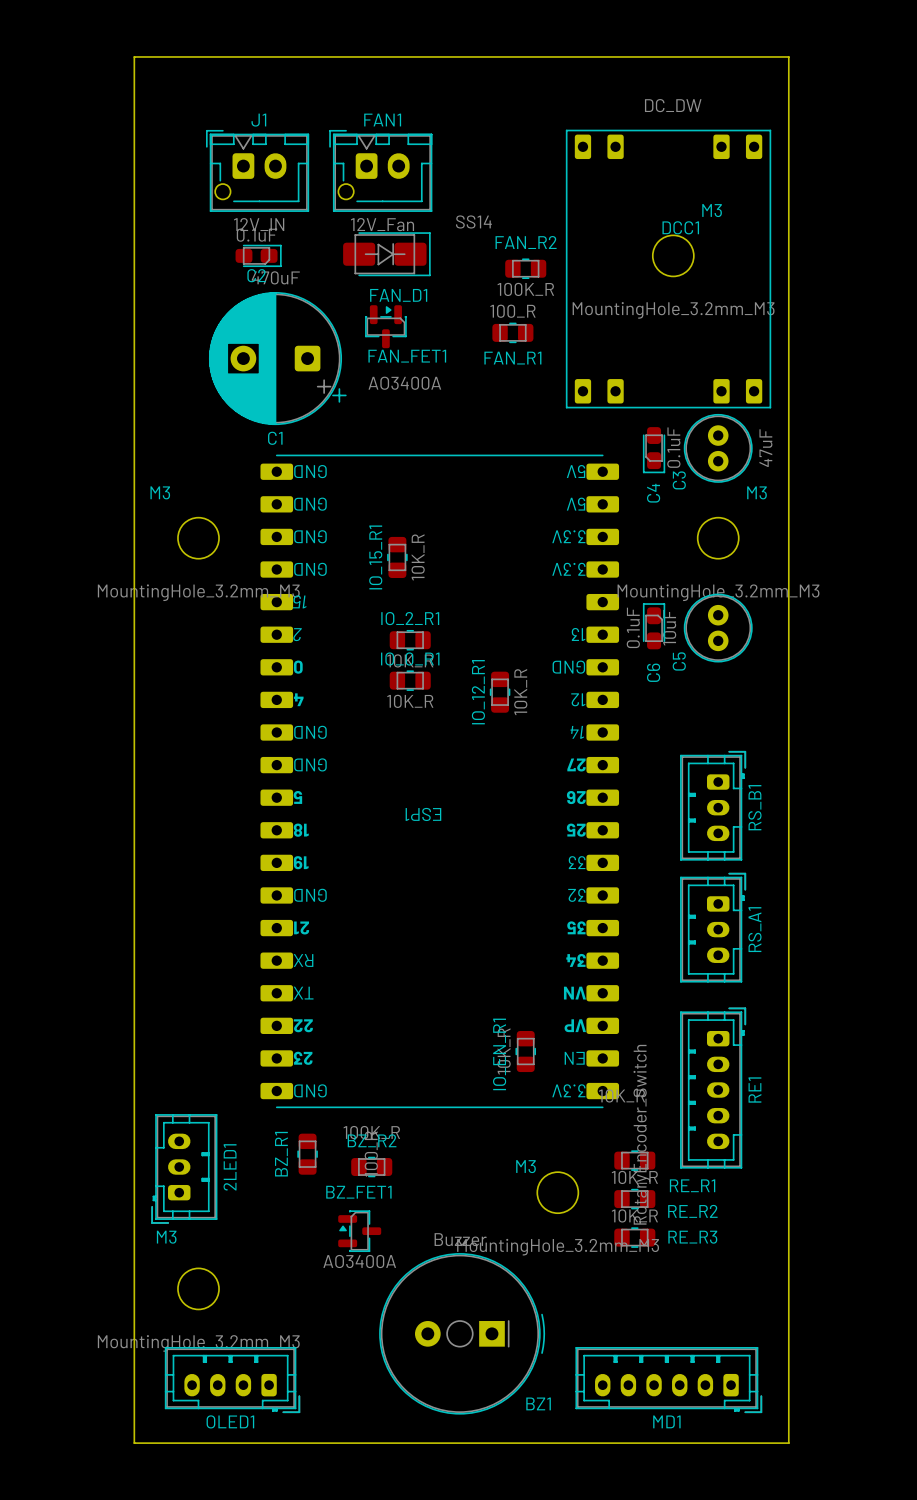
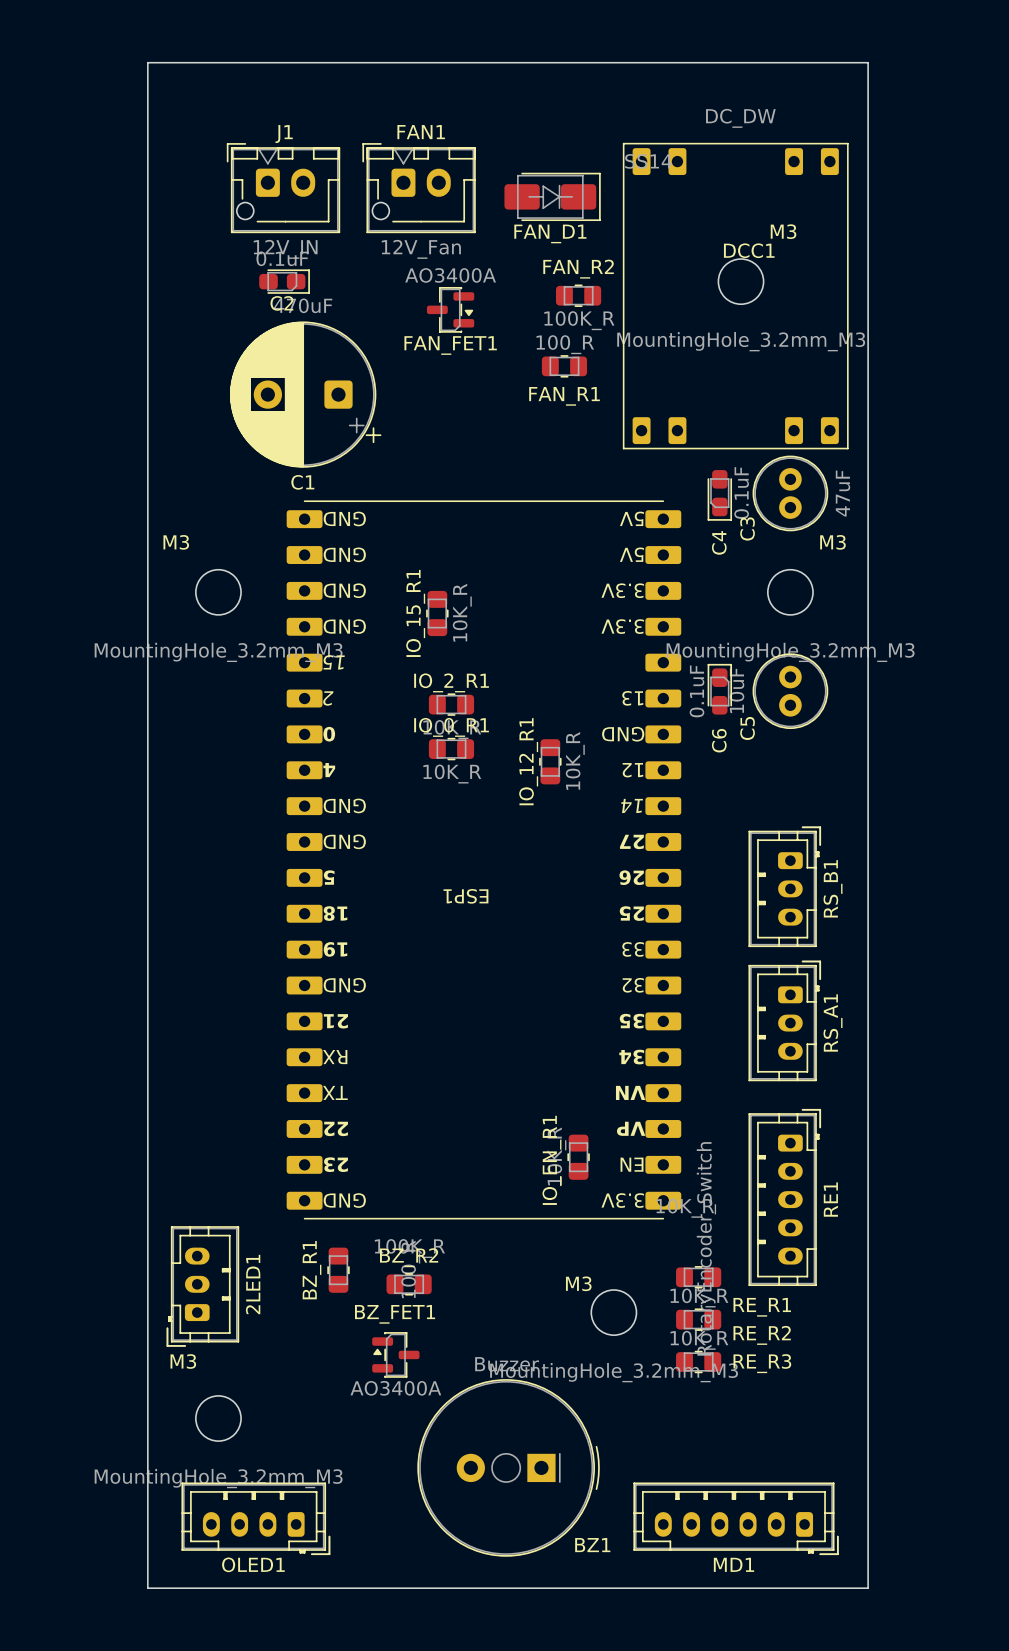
FAN_D1 position: (386, 254) -> (552, 196)
FAN_D1 name position: FAN_D1 (398, 295) -> FAN_D1 (550, 233)
FAN_FET1 rotation: 0° (385, 326) -> 90° clockwise (450, 309)
FAN_FET1 position: (385, 326) -> (450, 309)
FAN_FET1 value position: AO3400A (404, 383) -> AO3400A (450, 275)

